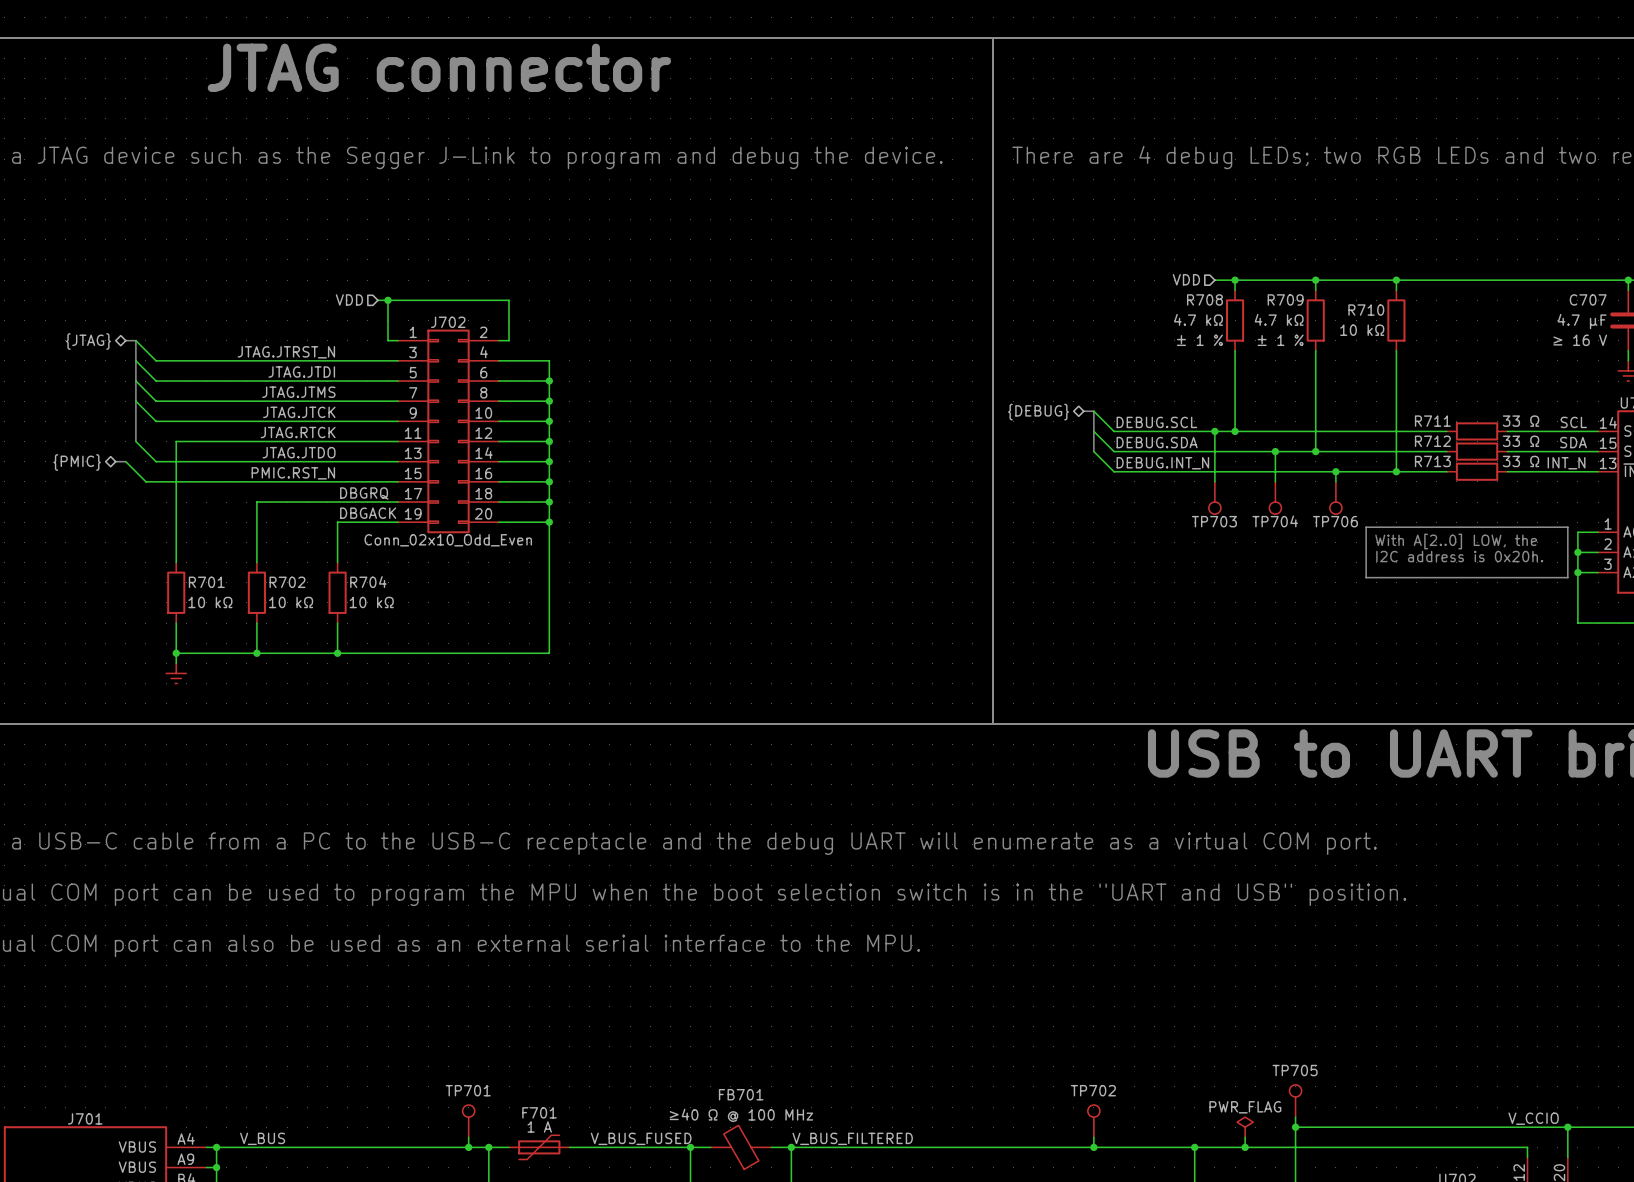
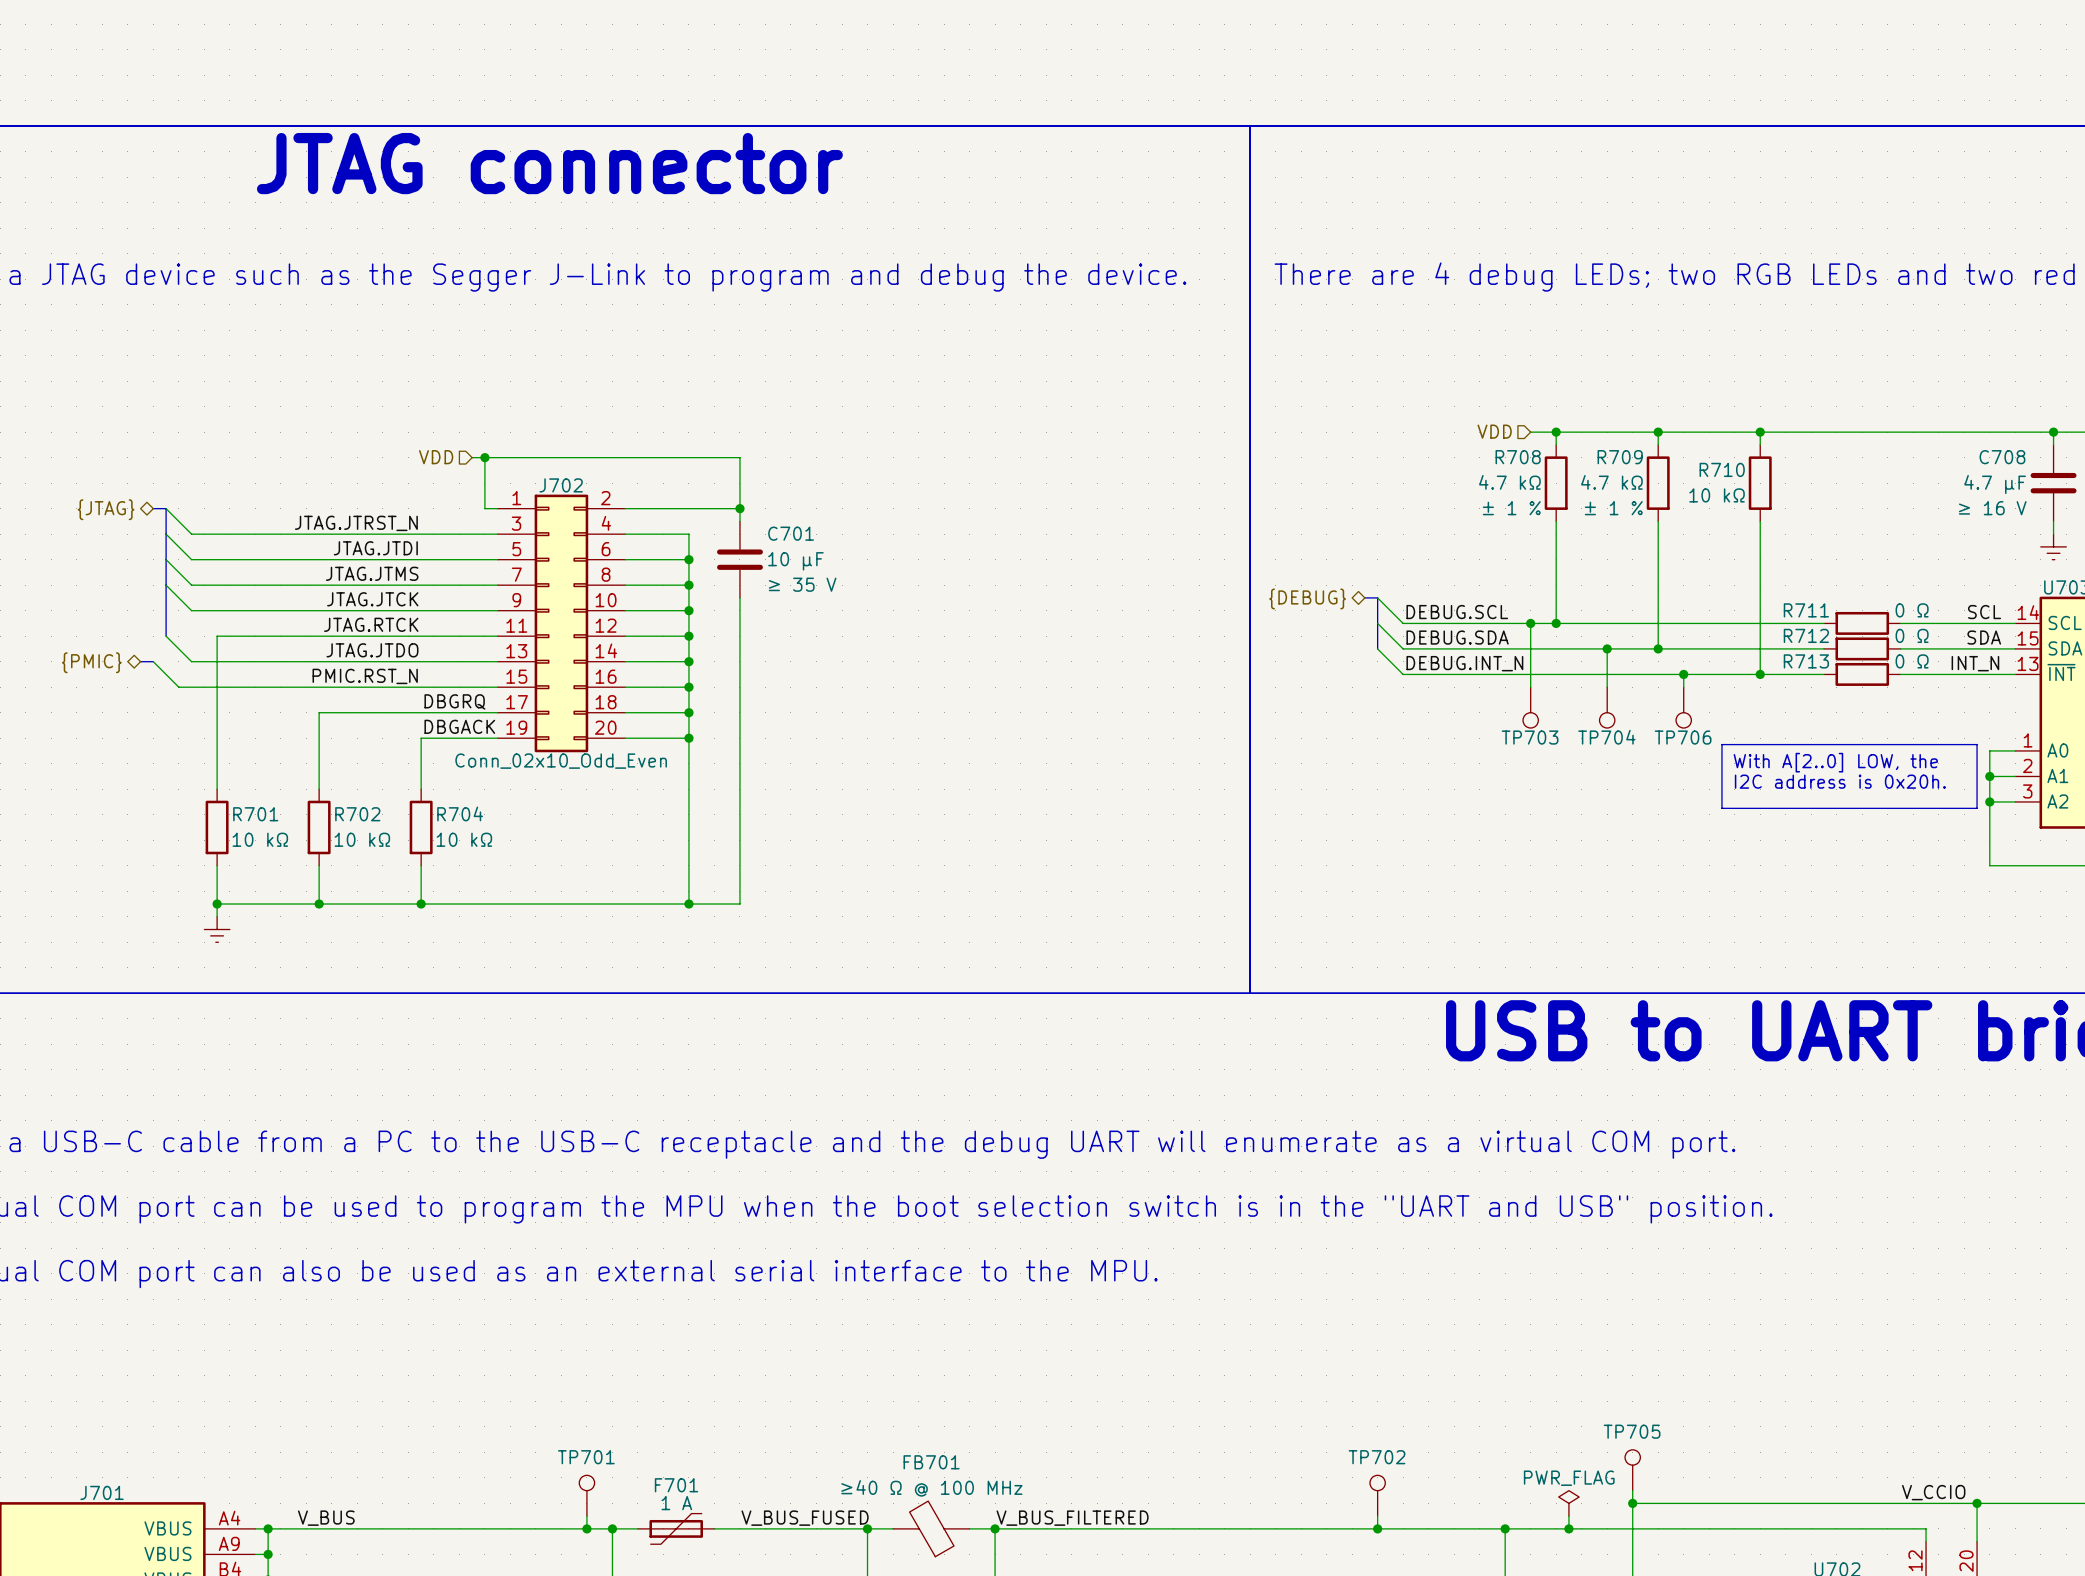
C707 name: C707 (1588, 299) -> C708 (2002, 457)
wire: (509, 300) (509, 340) -> (637, 457) (739, 457) (739, 521)
wire: none -> (637, 508) (739, 508)
junction: none -> (739, 508)
C701: none -> 10 µF (739, 559)
wire: none -> (739, 597) (739, 904) (688, 904)
R711 value: 33 Ω (1521, 421) -> 0 Ω (1912, 610)
R712 value: 33 Ω (1521, 441) -> 0 Ω (1912, 635)
R713 value: 33 Ω (1521, 461) -> 0 Ω (1912, 661)
junction: none -> (688, 904)

